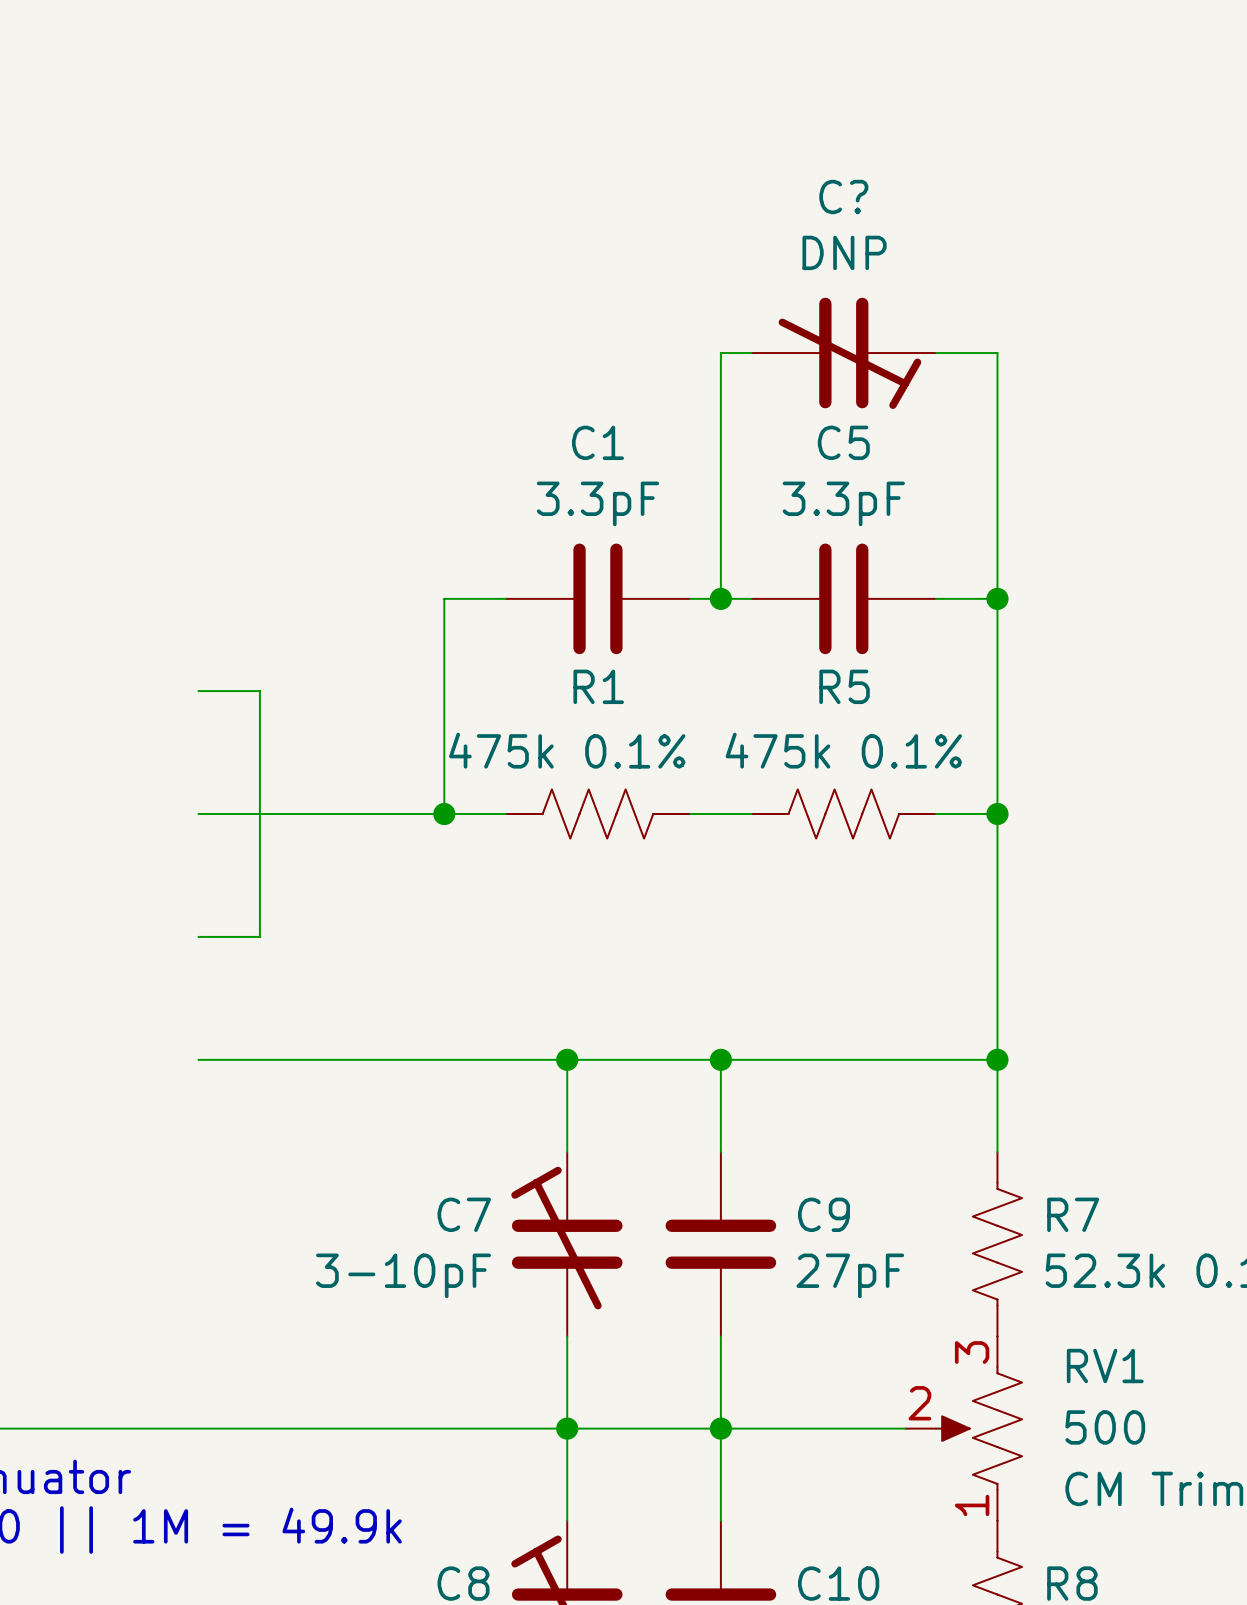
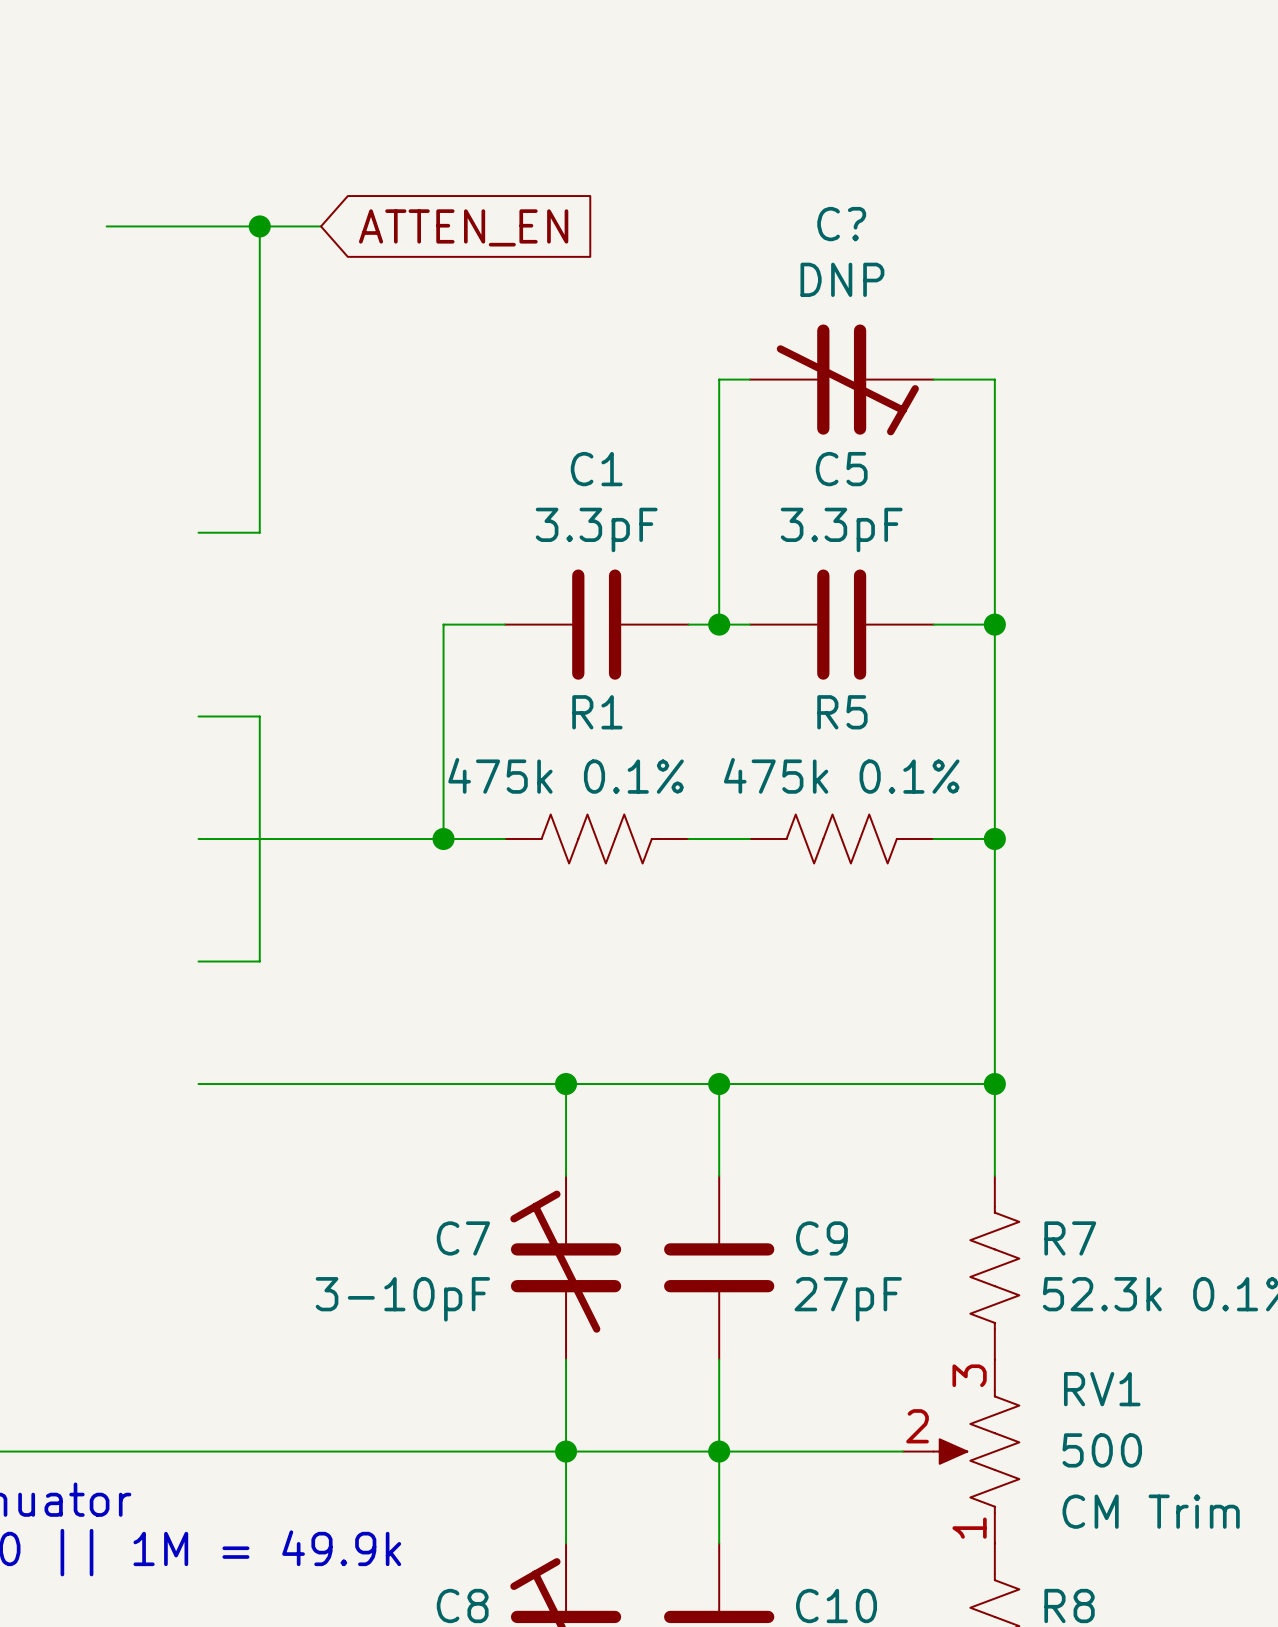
wire: none -> (106, 226) (321, 226)
wire: none -> (259, 226) (259, 532) (198, 532)
junction: none -> (259, 226)
global label: none -> ATTEN_EN (463, 227)

